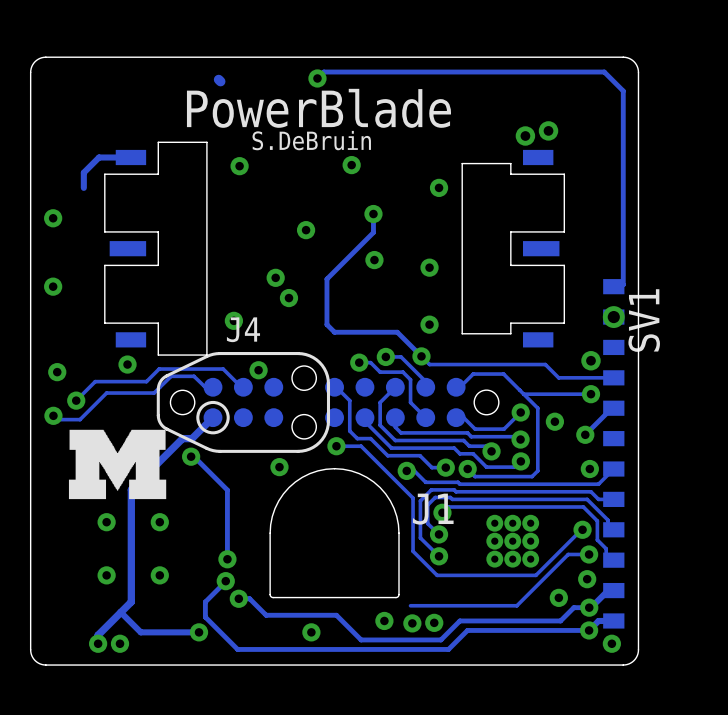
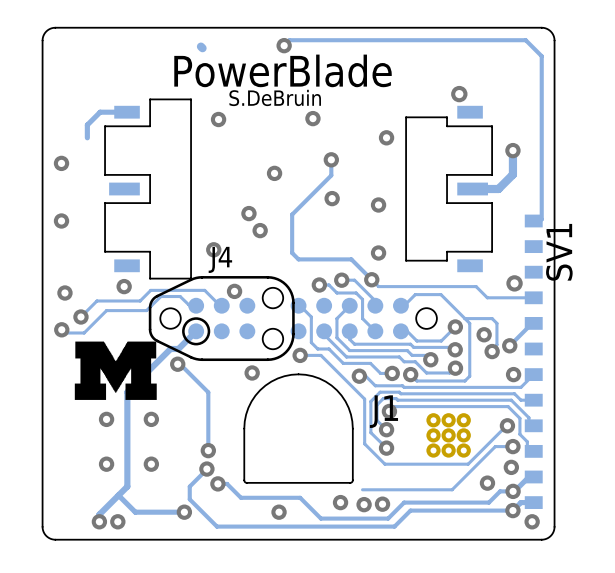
via: (548, 130) -> none
track: none -> (512, 150) (512, 174) (498, 189) (472, 189)
via: none -> (512, 150)
via: (613, 317) -> none
track: (590, 394) (523, 394) -> none
via position: (590, 394) -> (492, 351)
track: none -> (464, 318) (492, 318) (496, 323) (496, 344) (492, 351)

